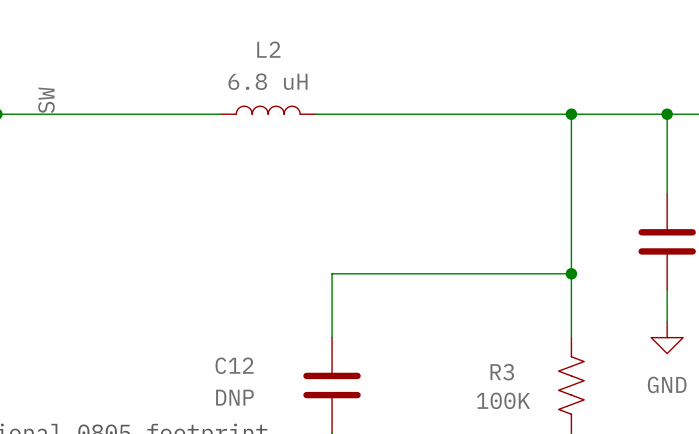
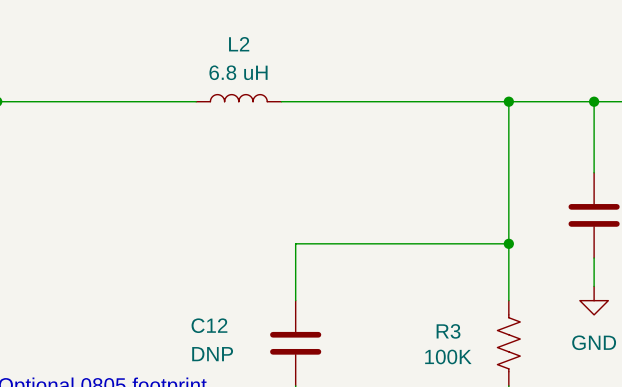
label: SW (46, 100) -> none

